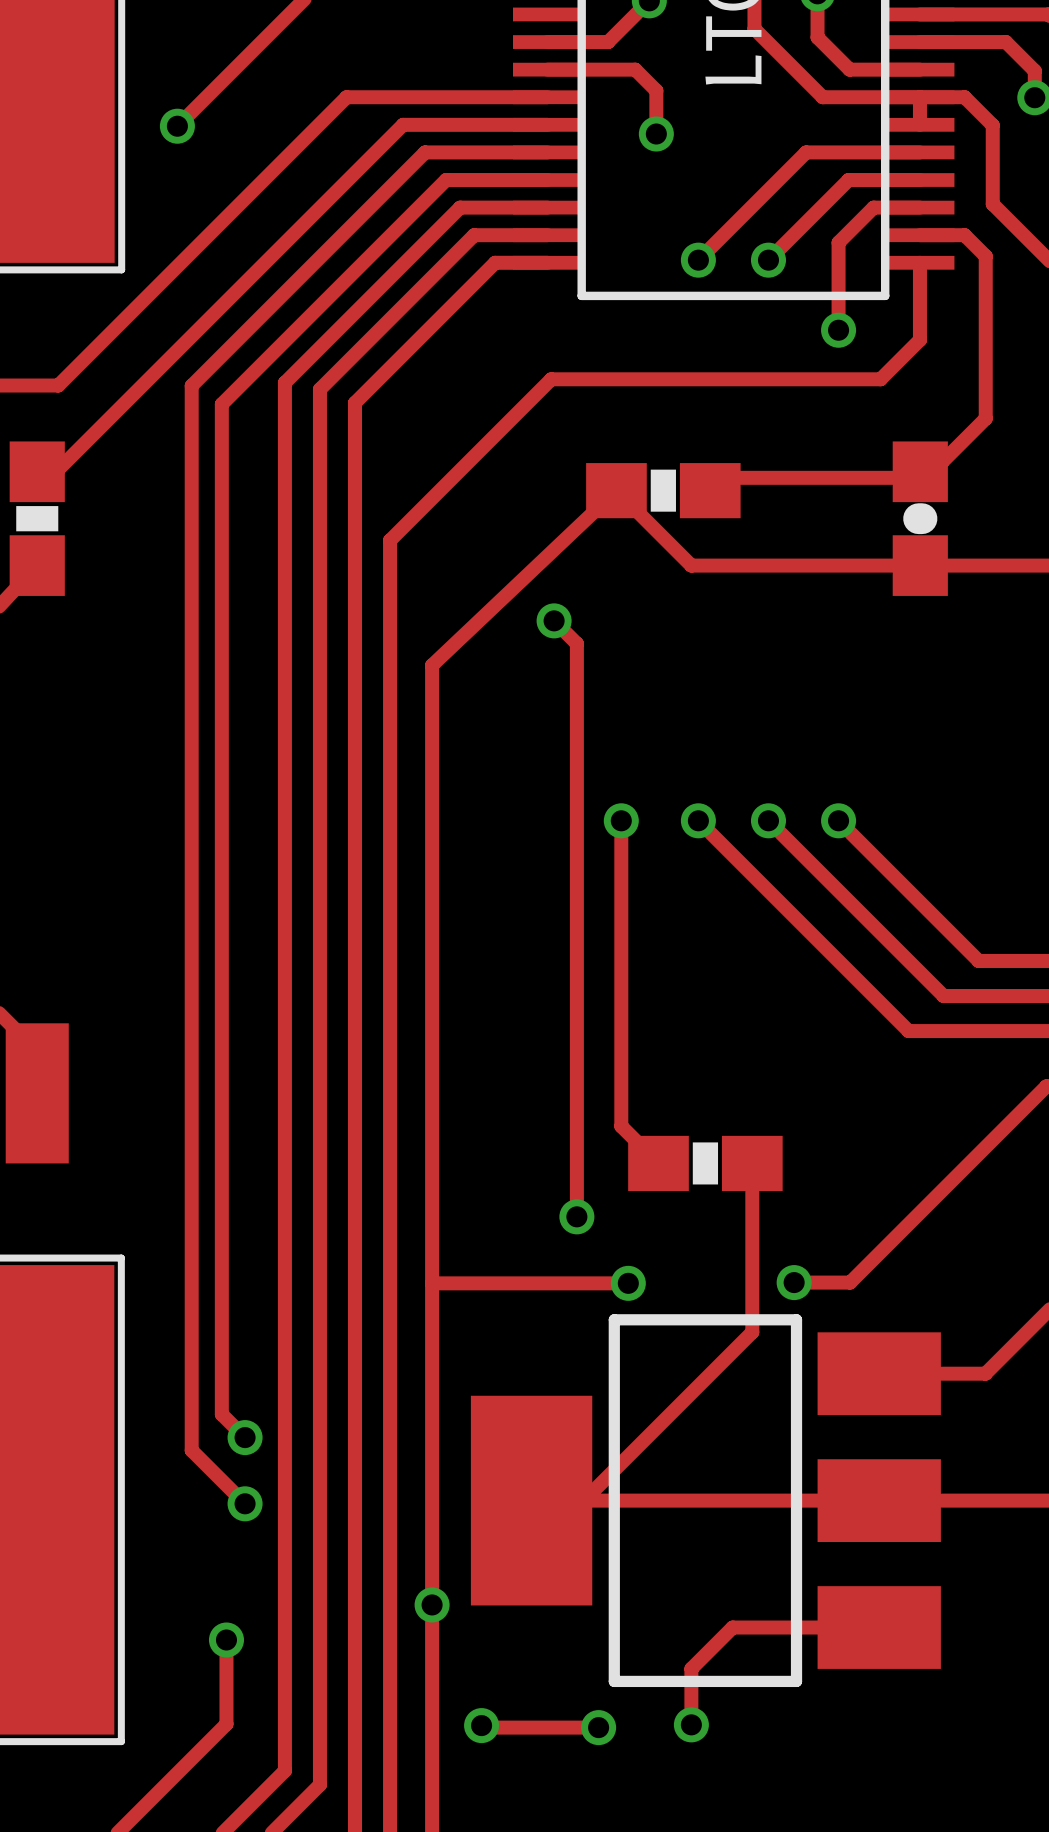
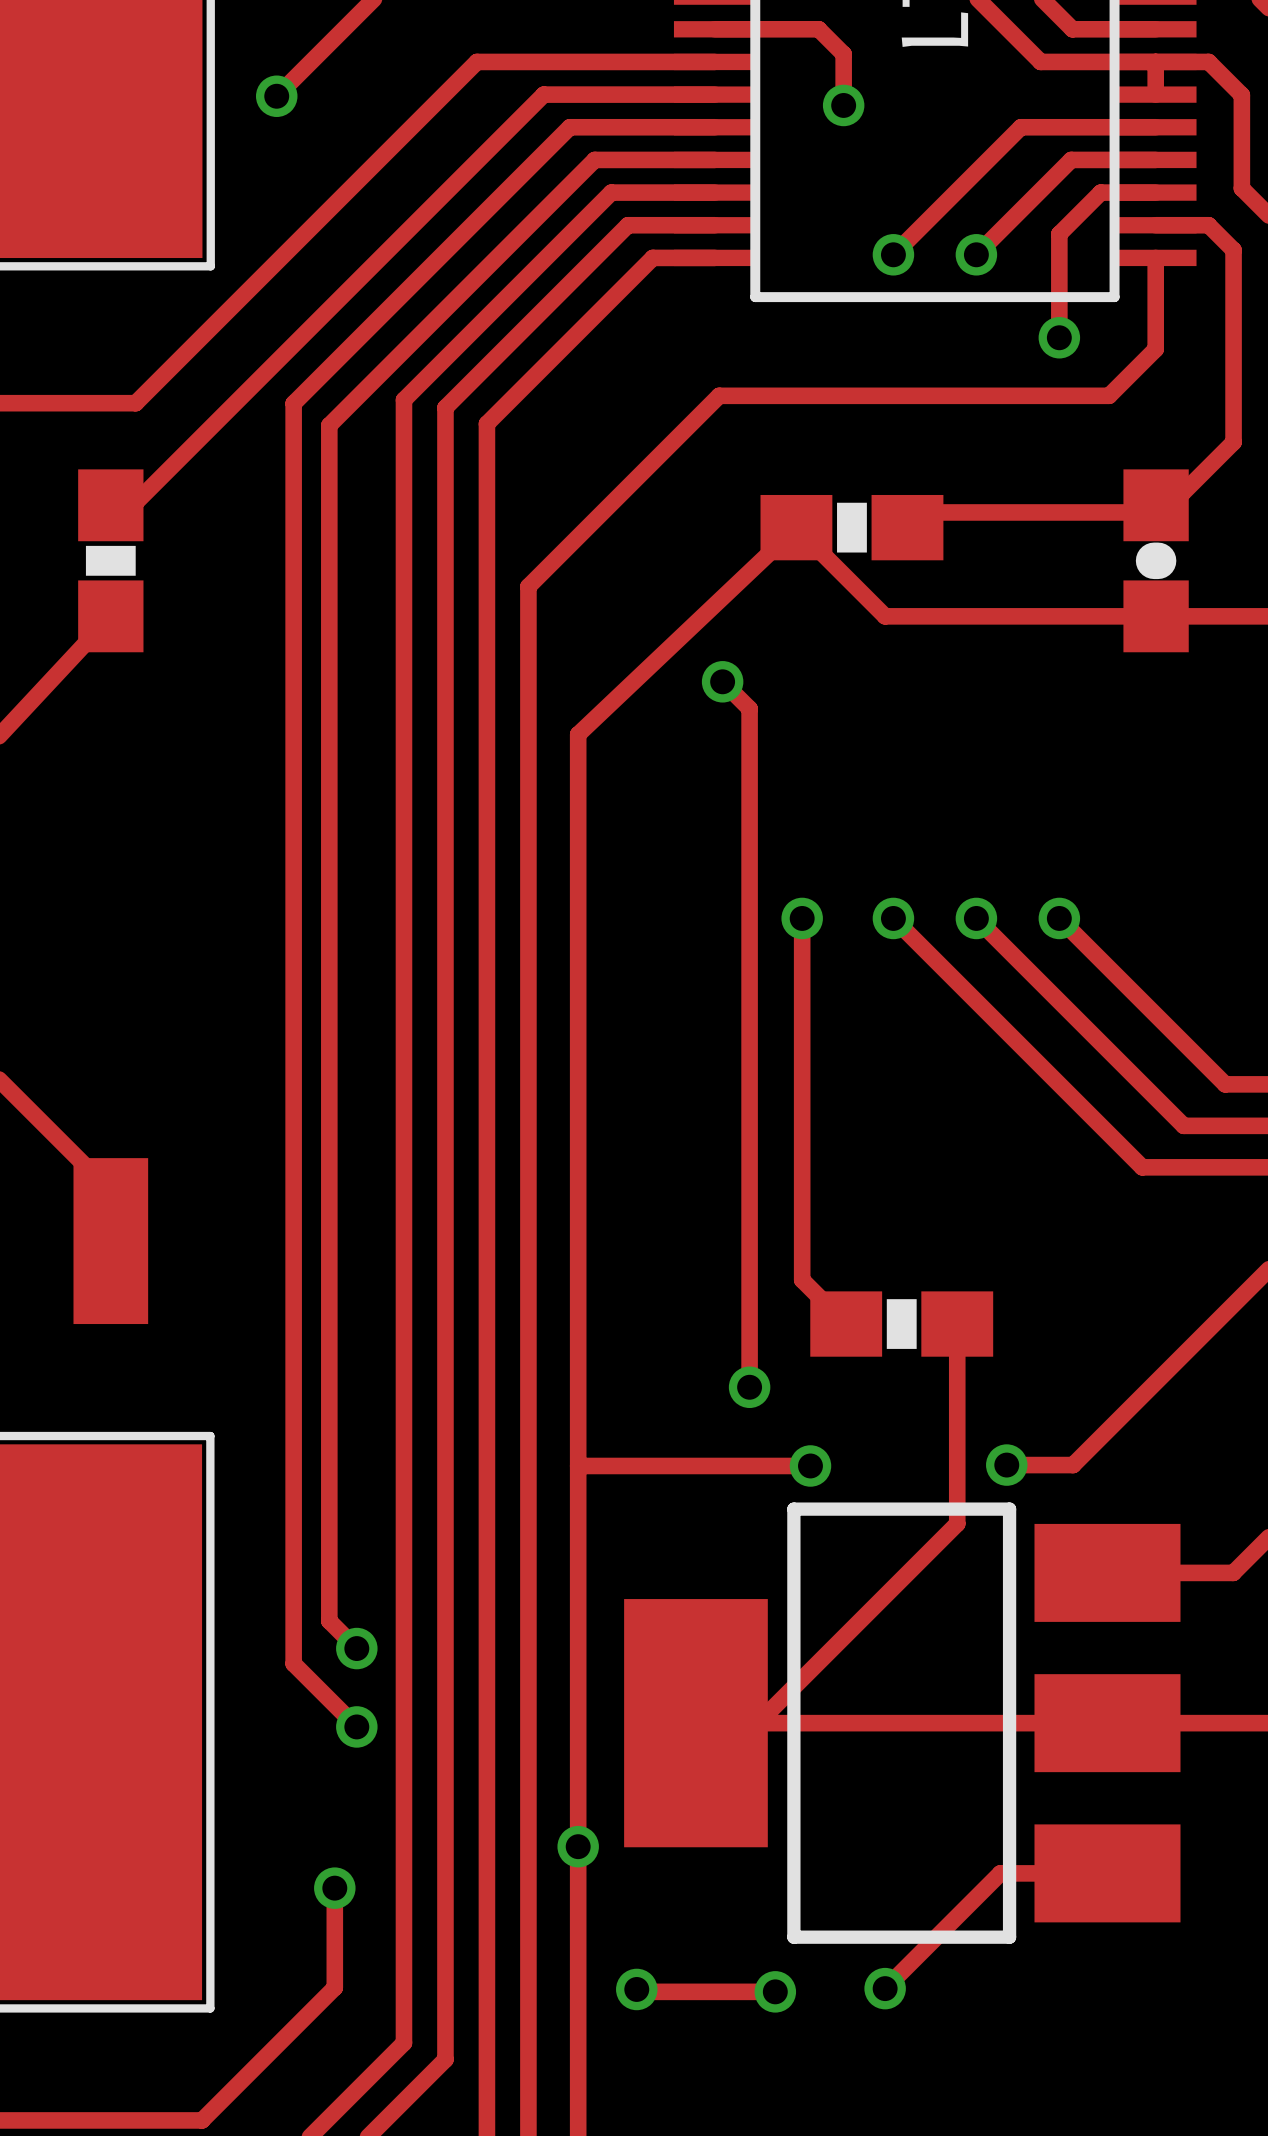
track: (788, 1627) (732, 1627) (691, 1668) (691, 1724) -> (1000, 1873) (885, 1988)

